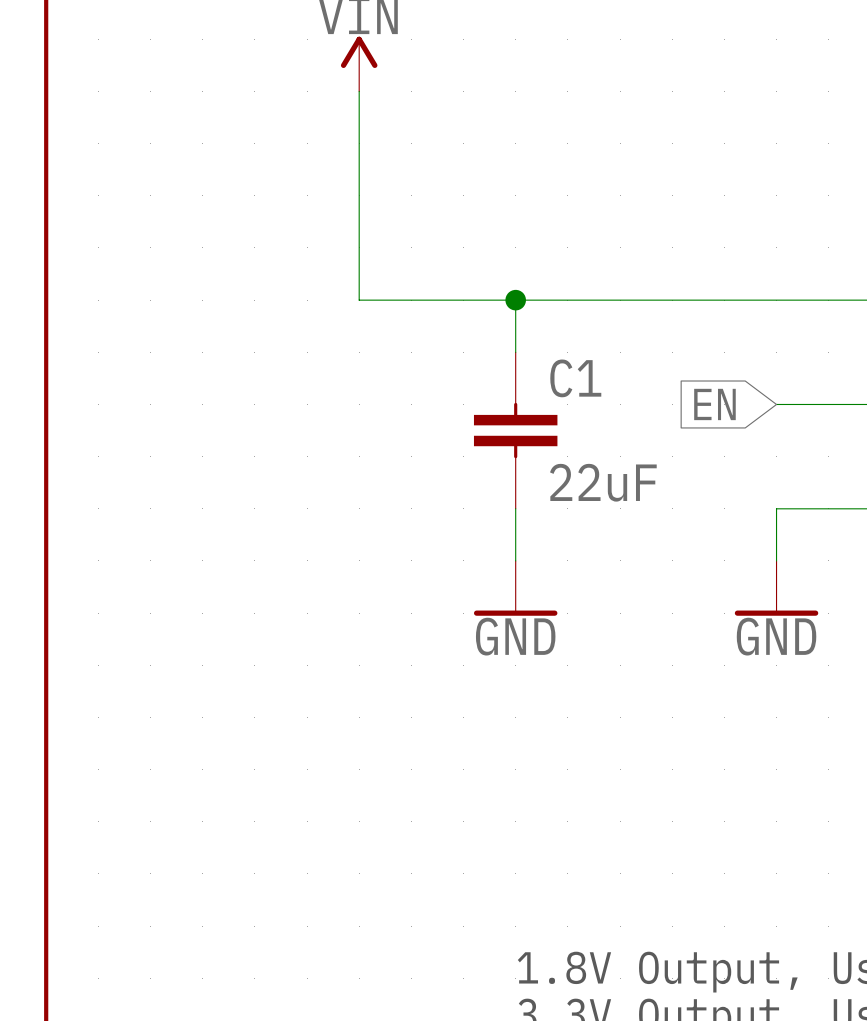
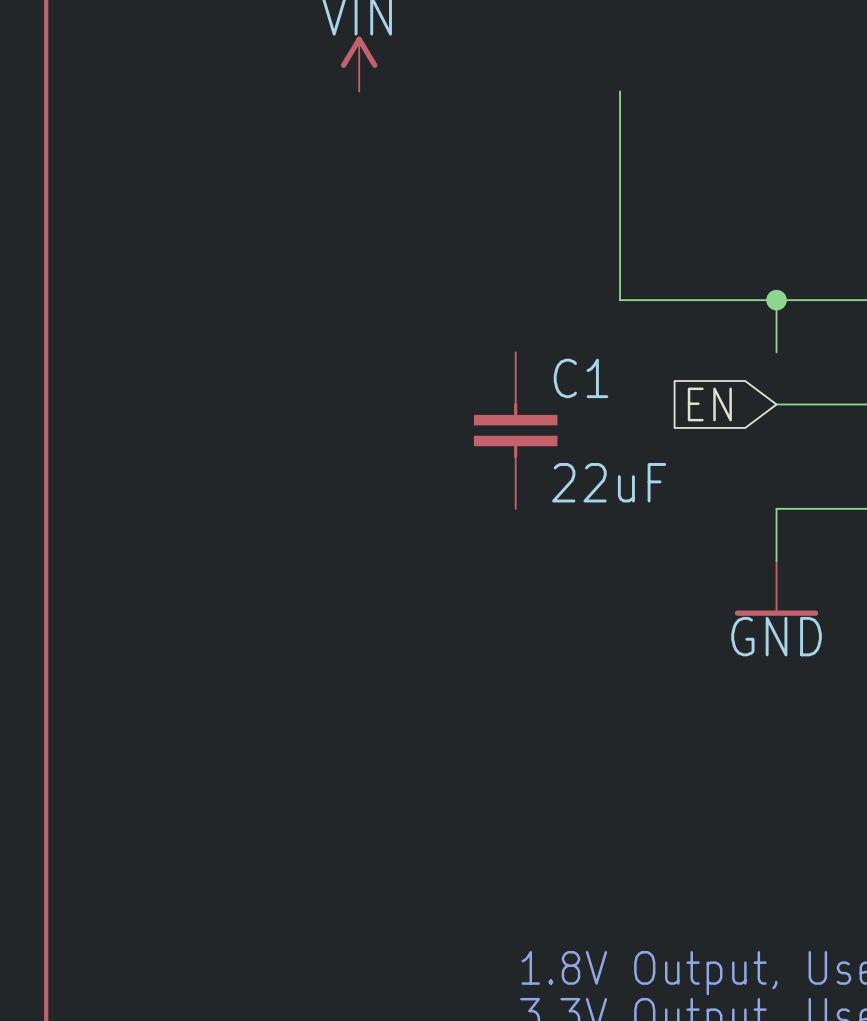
wire: (359, 91) (359, 300) (620, 300) -> (620, 91) (620, 300)
wire: (515, 300) (515, 352) -> (776, 300) (776, 352)
junction: (515, 300) -> none
junction: none -> (776, 300)
wire: (515, 508) (515, 560) -> none
power symbol: GND (515, 588) -> none

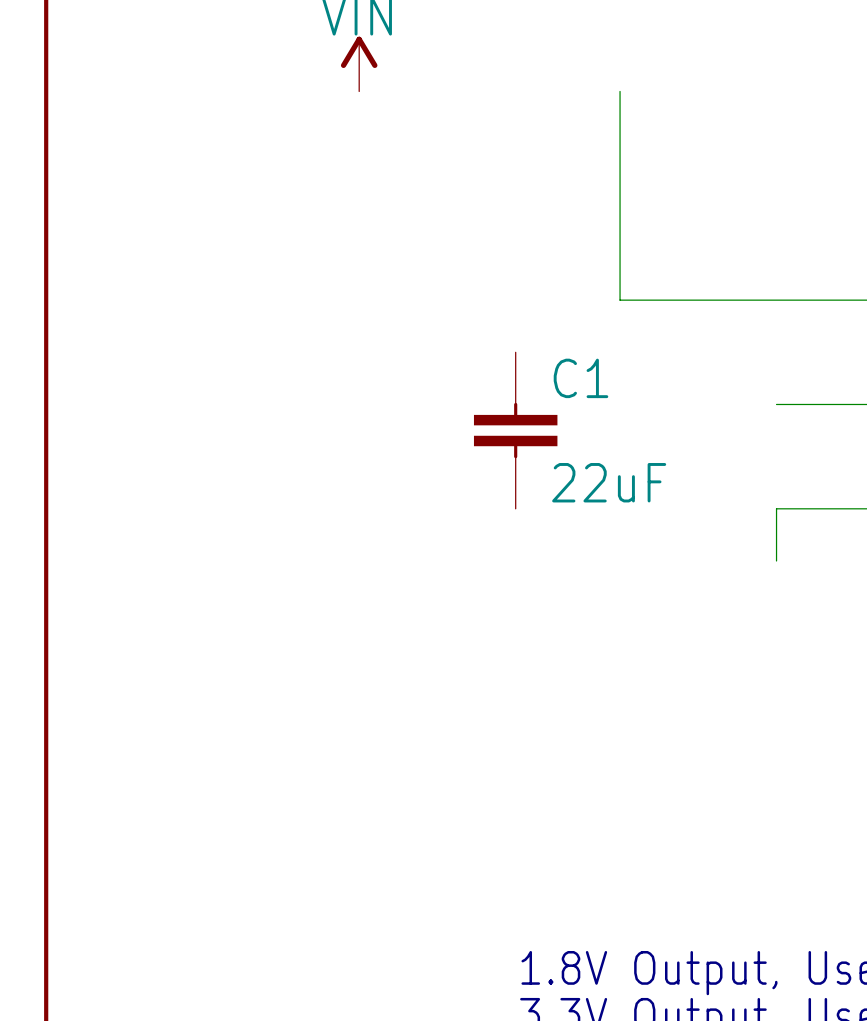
wire: (776, 300) (776, 352) -> none
junction: (776, 300) -> none
global label: EN (709, 404) -> none
power symbol: GND (776, 588) -> none

